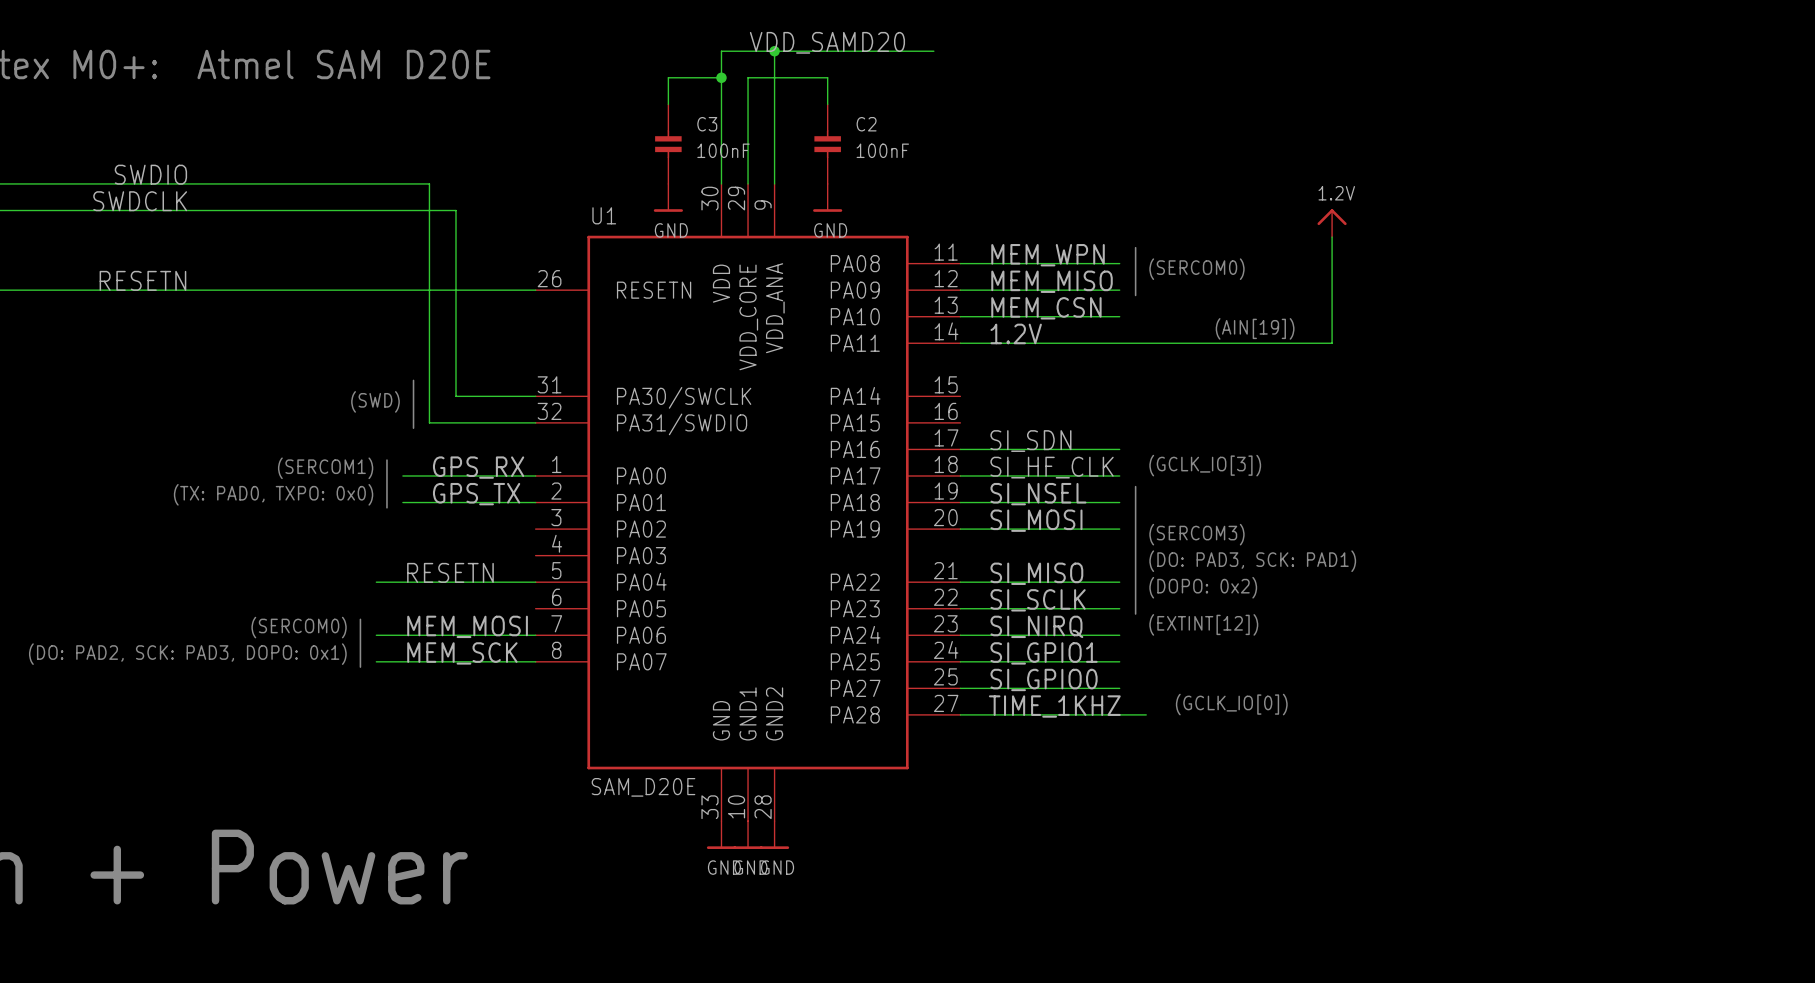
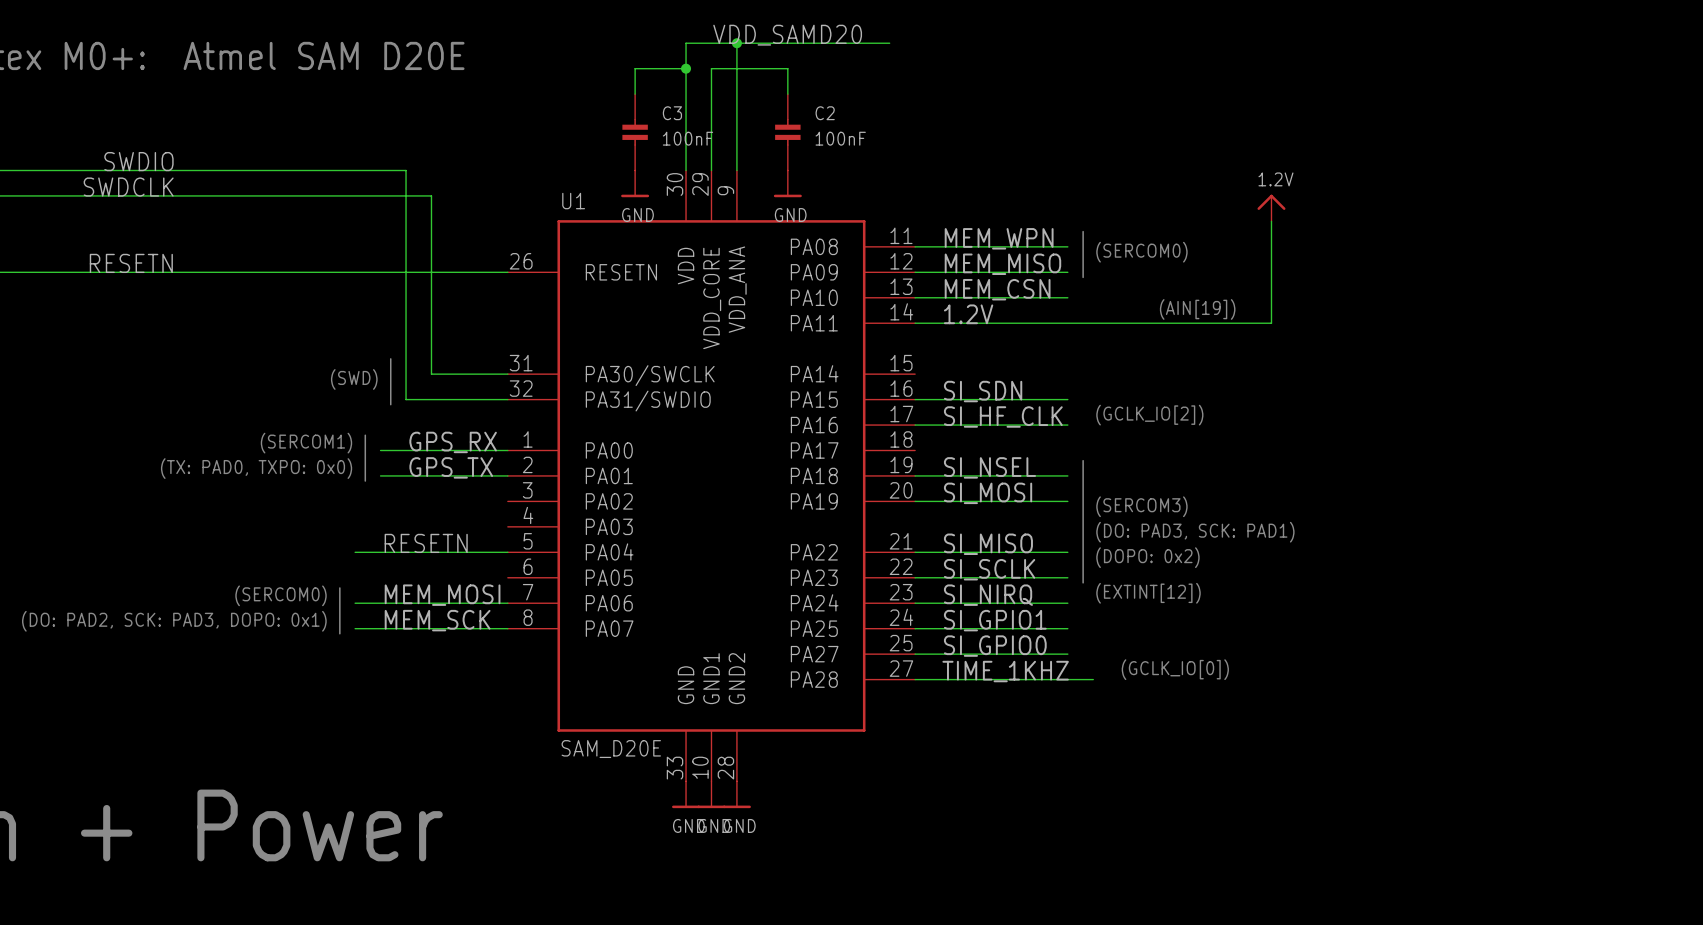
label: none -> SI_SDN (983, 391)
label: SI_SDN (1030, 441) -> SI_HF_CLK (1003, 416)
text: (GCLK_IO[3]) (1205, 465) -> (GCLK_IO[2]) (1149, 415)
label: SI_HF_CLK (1052, 467) -> none
wire: (960, 475) (1119, 475) -> (915, 399) (1067, 399)

